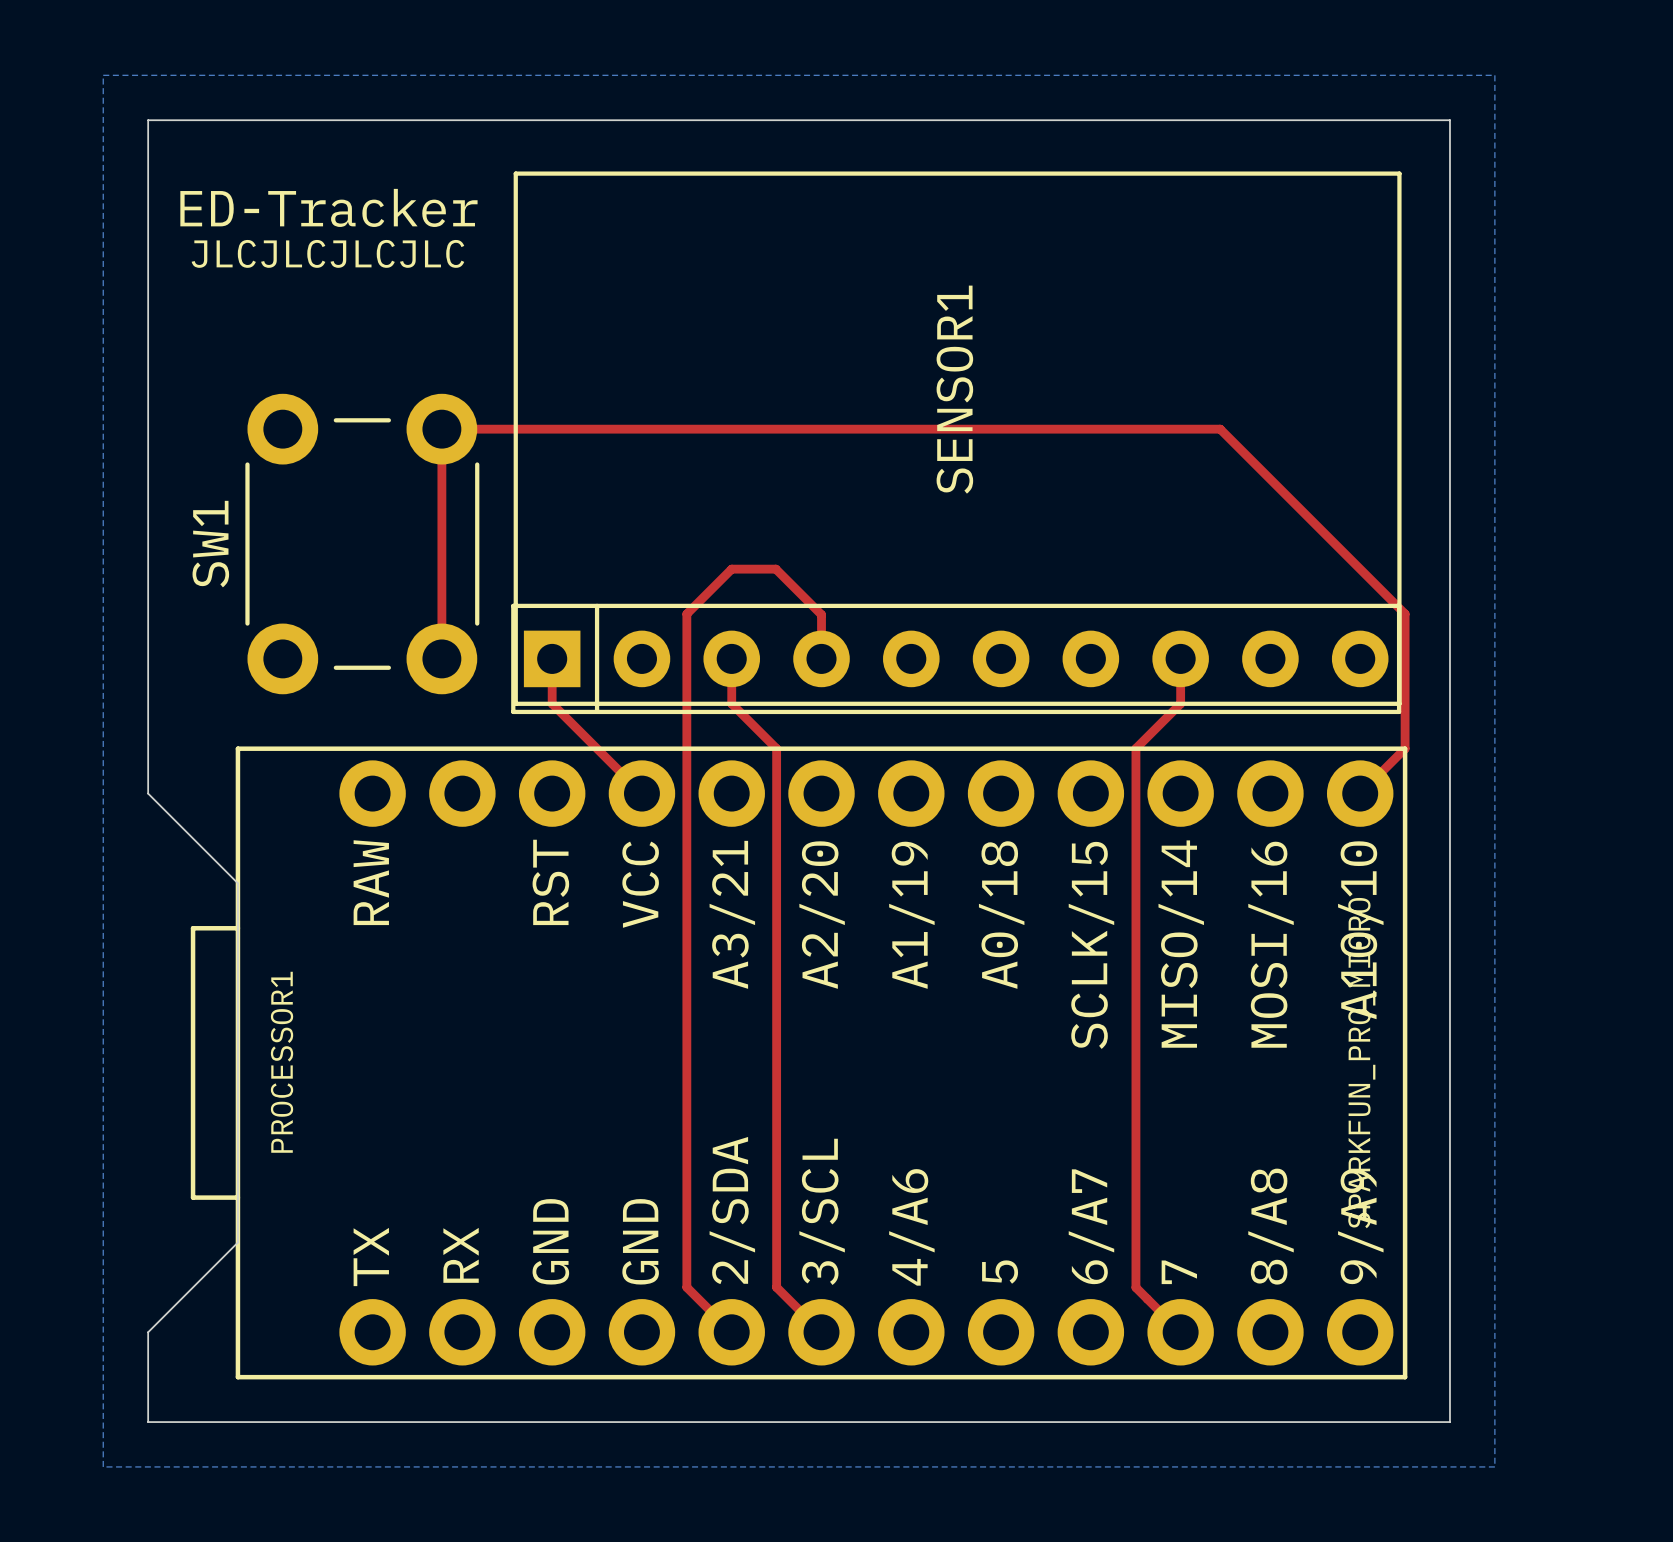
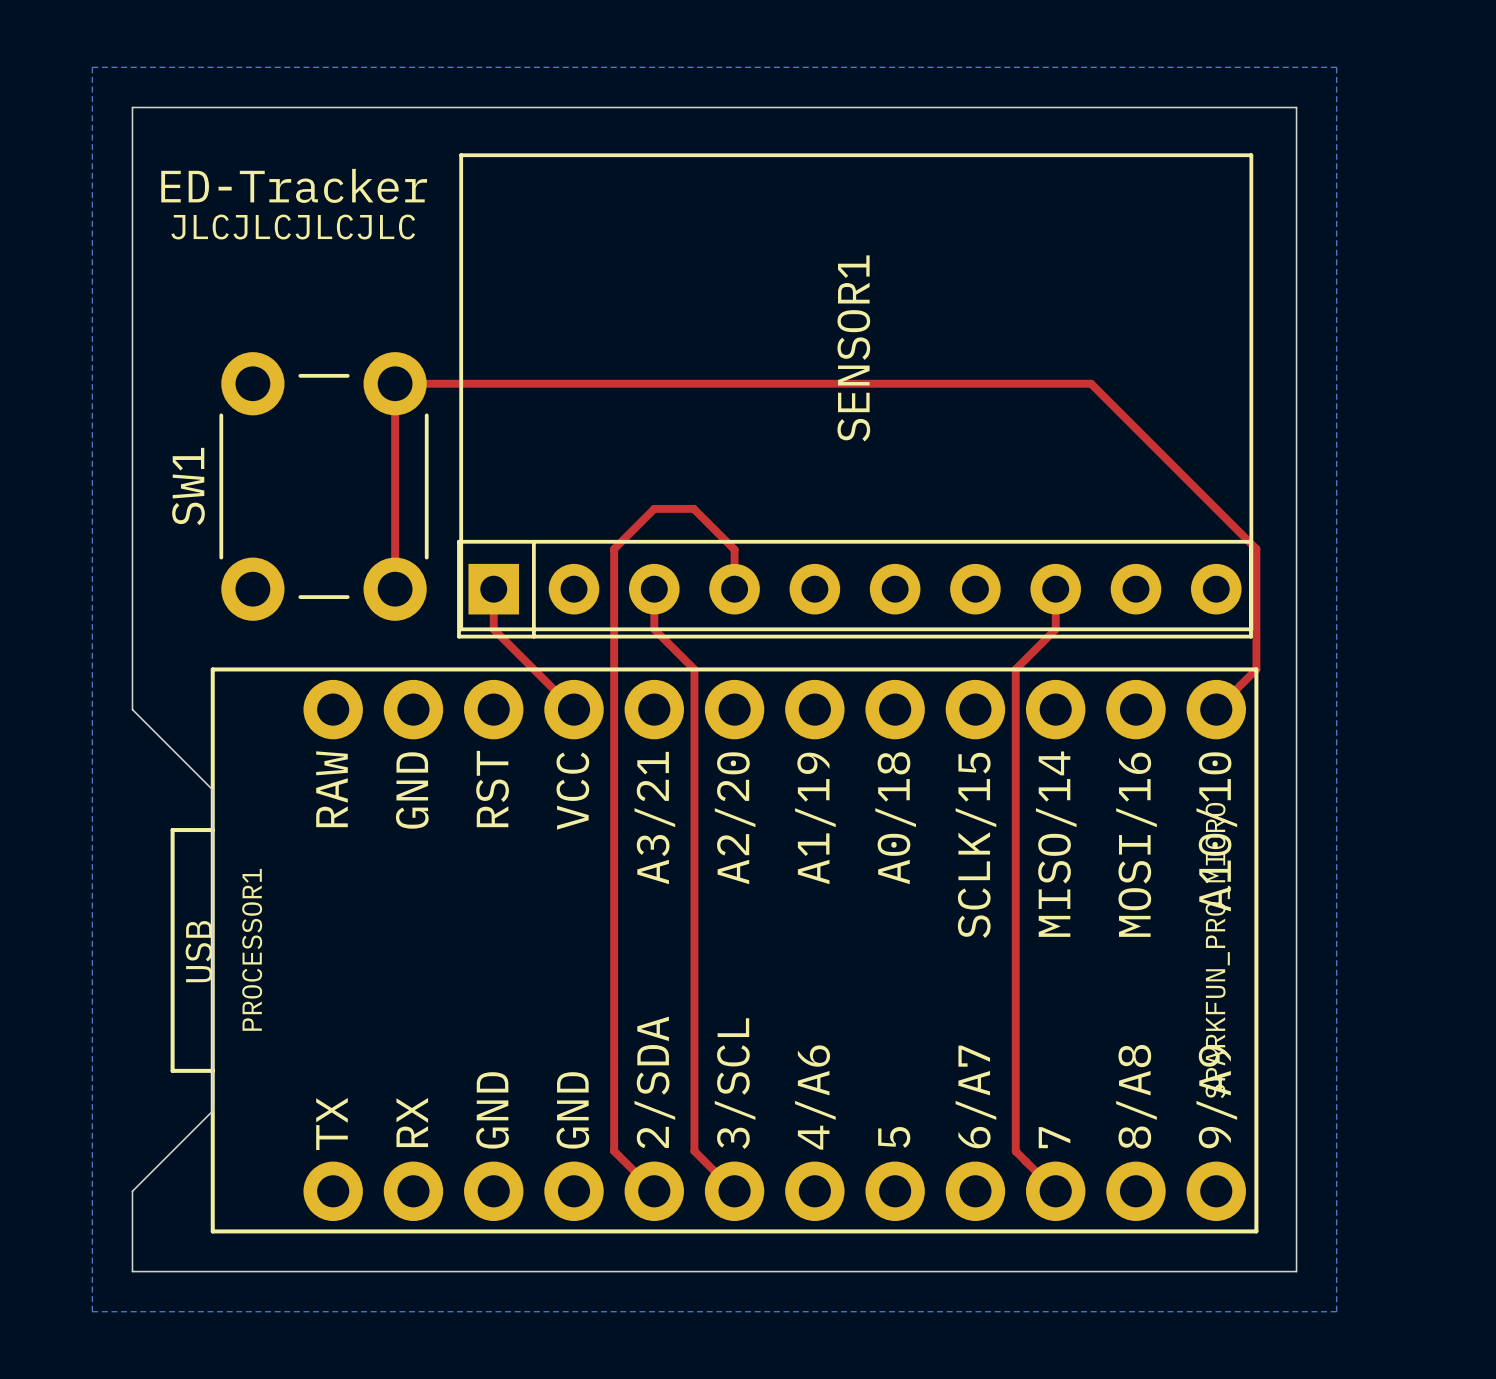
PROCESSOR1 text: none -> GND (412, 790)
PROCESSOR1 text: none -> USB (198, 951)

